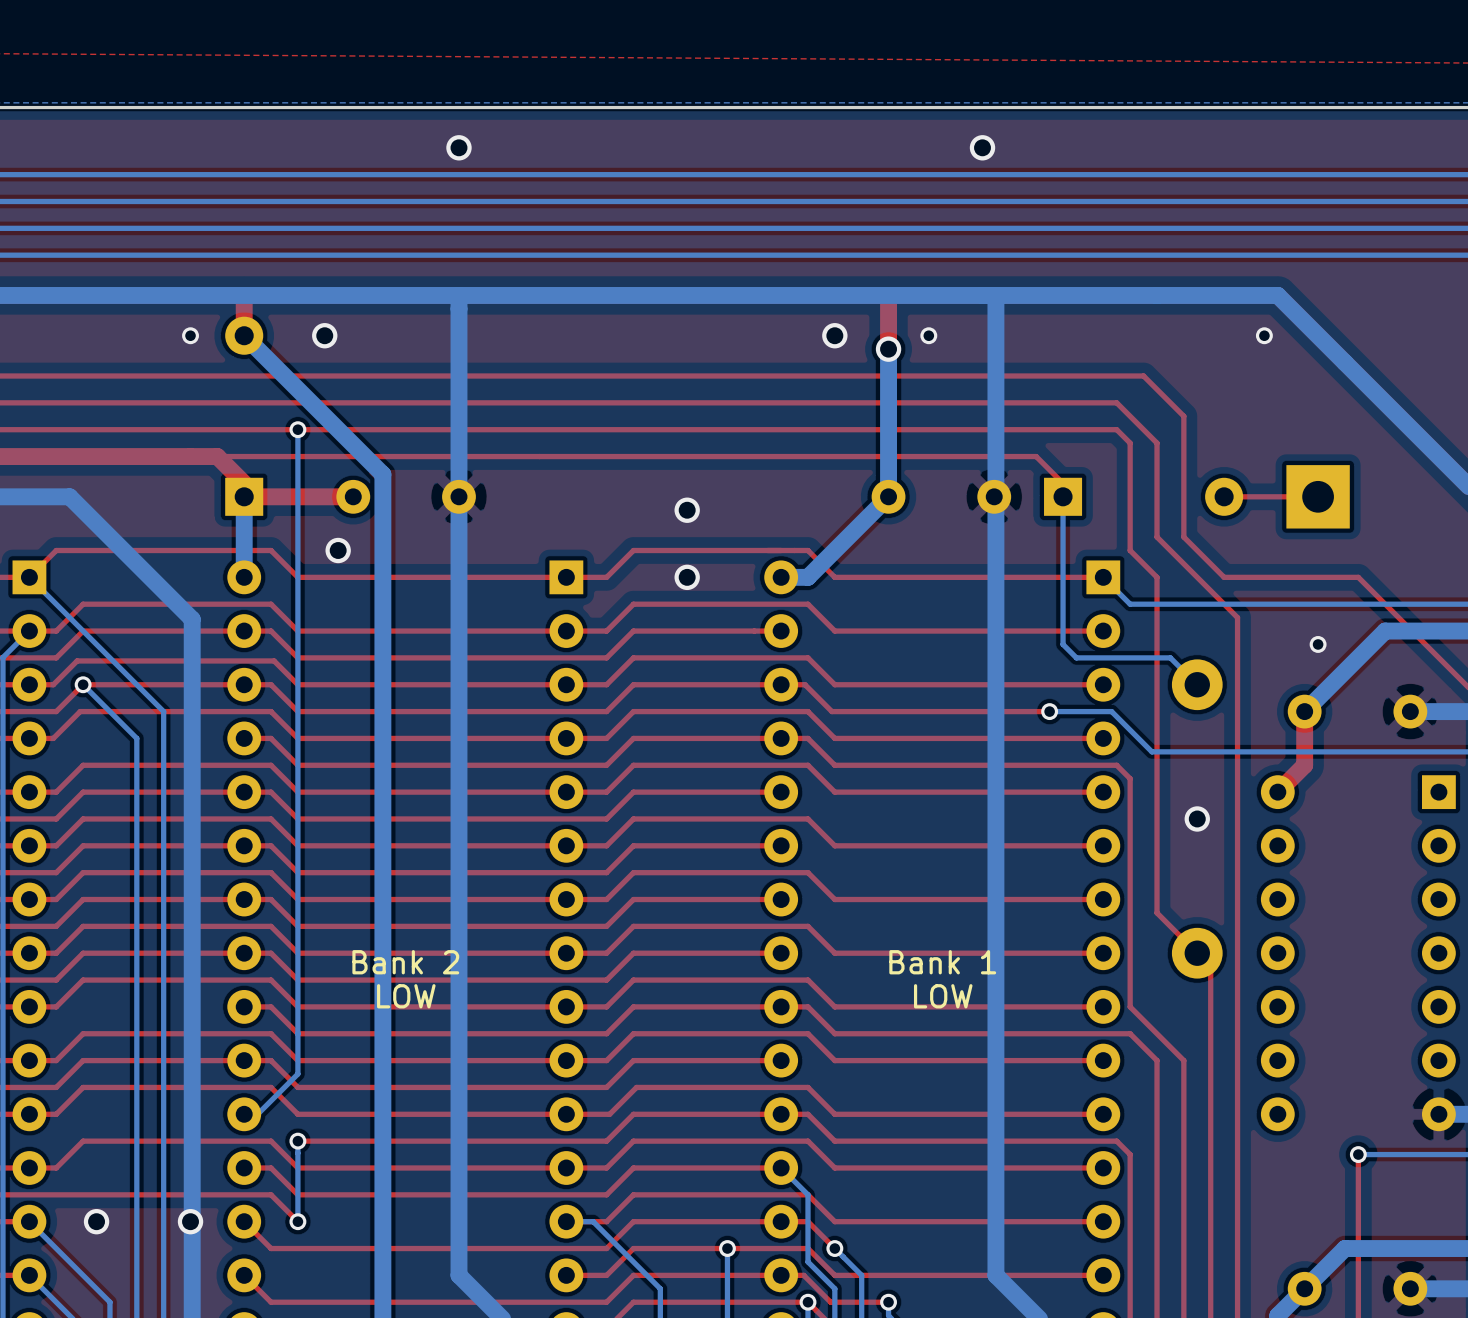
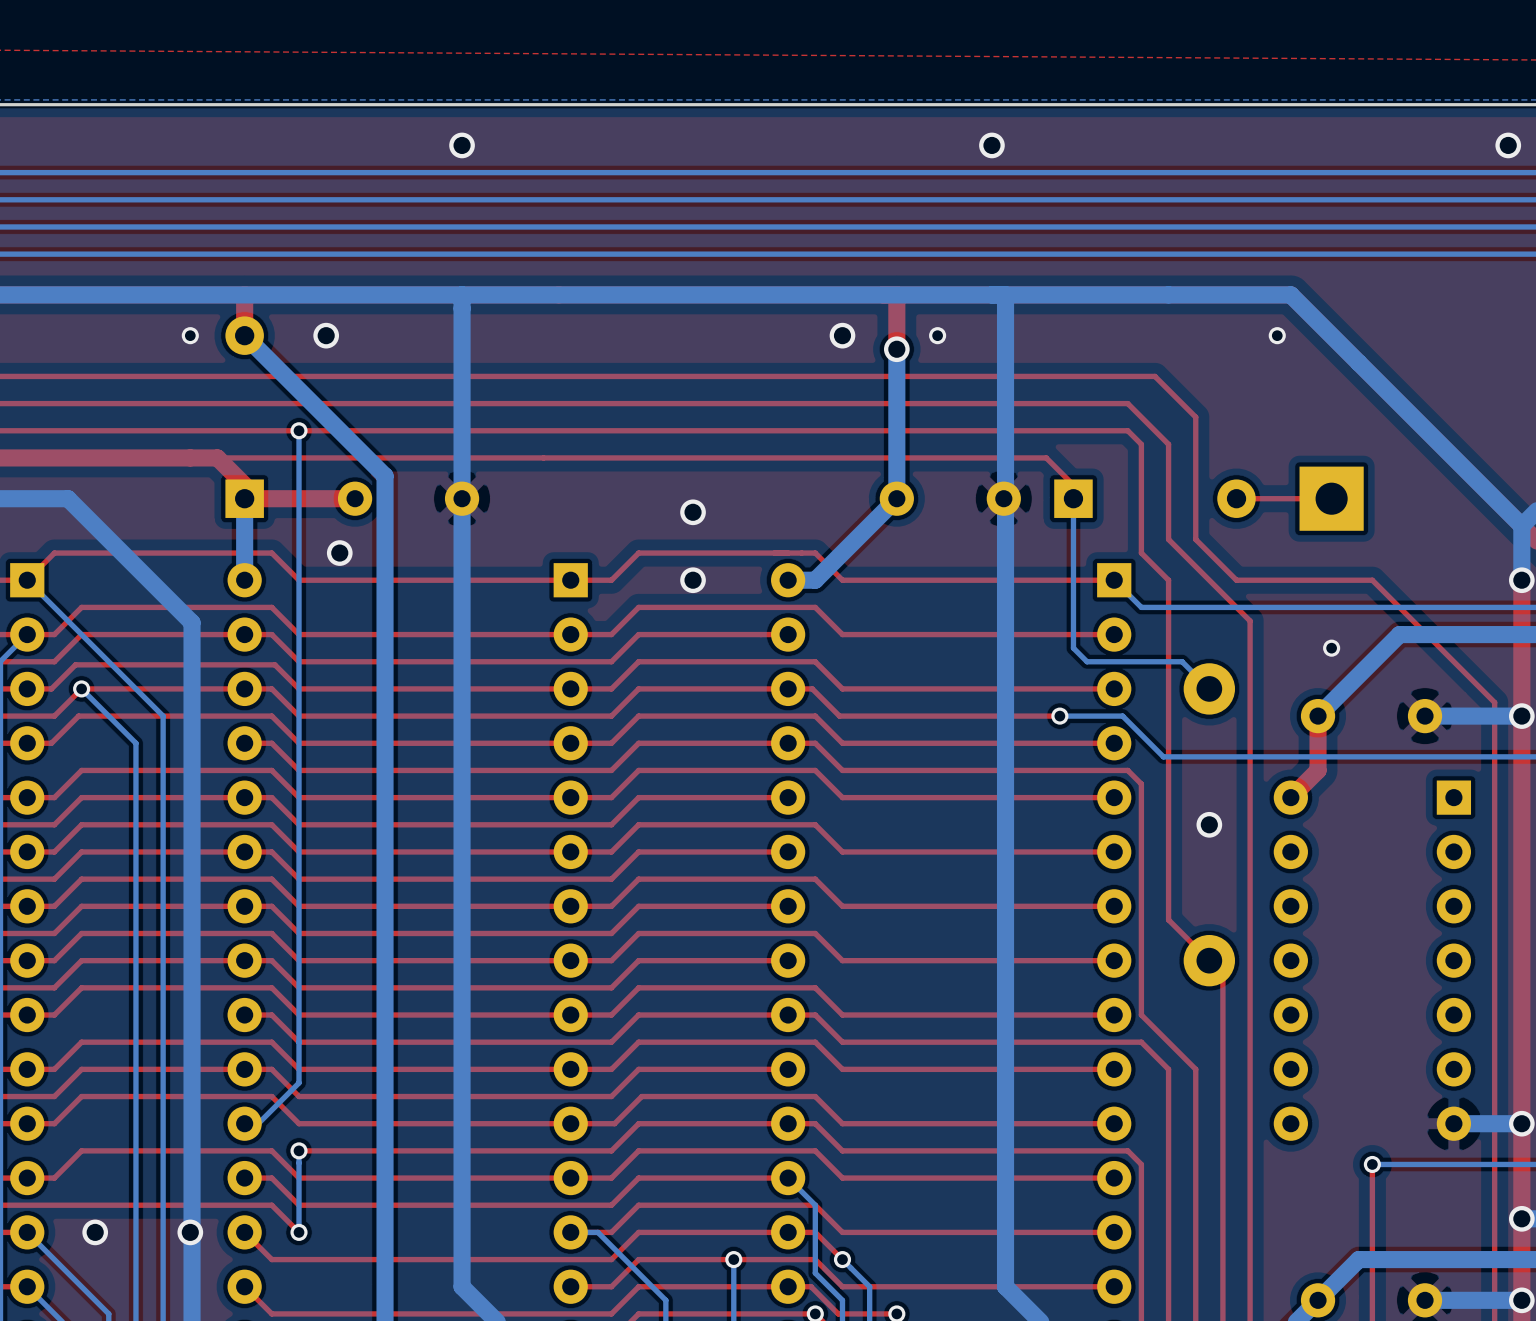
text: Bank 2 (405, 962) -> none
text: Bank 1 (942, 962) -> none
text: LOW (406, 996) -> none
text: LOW (943, 996) -> none

